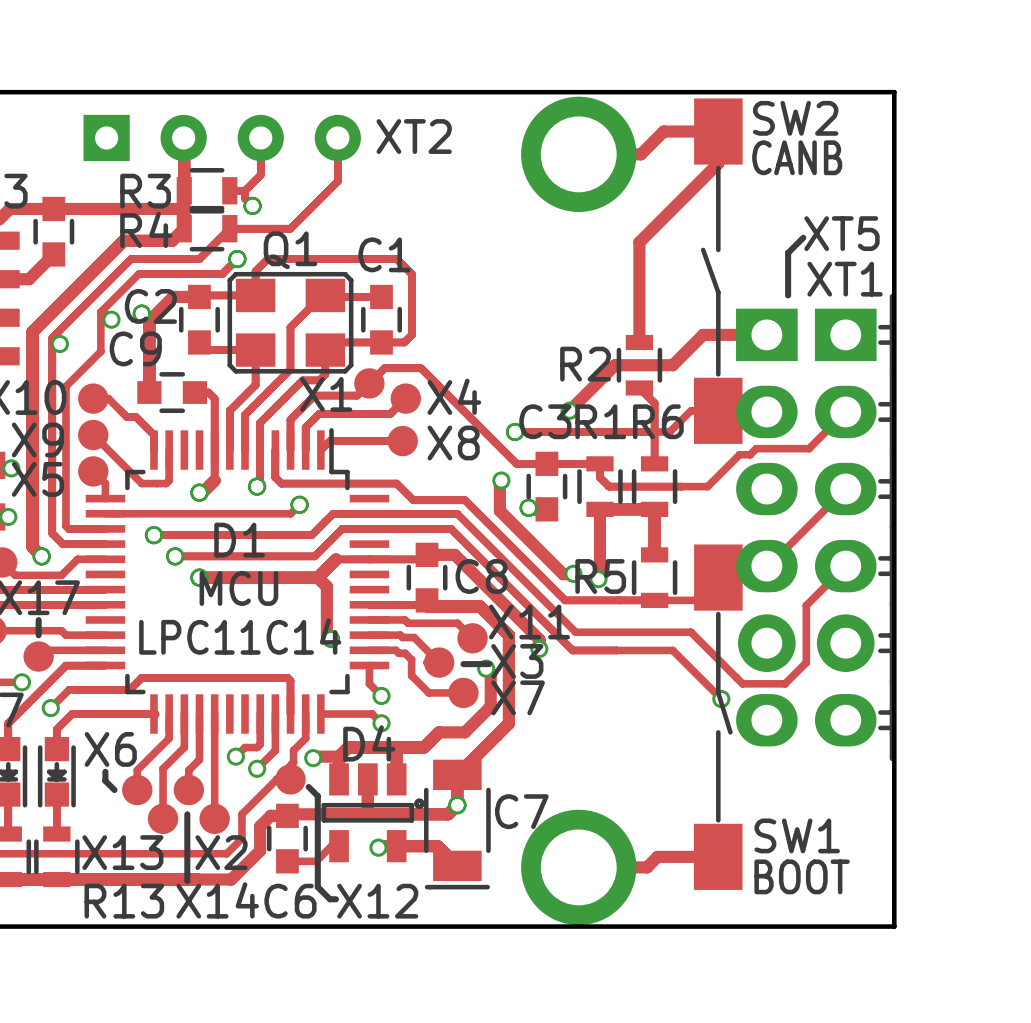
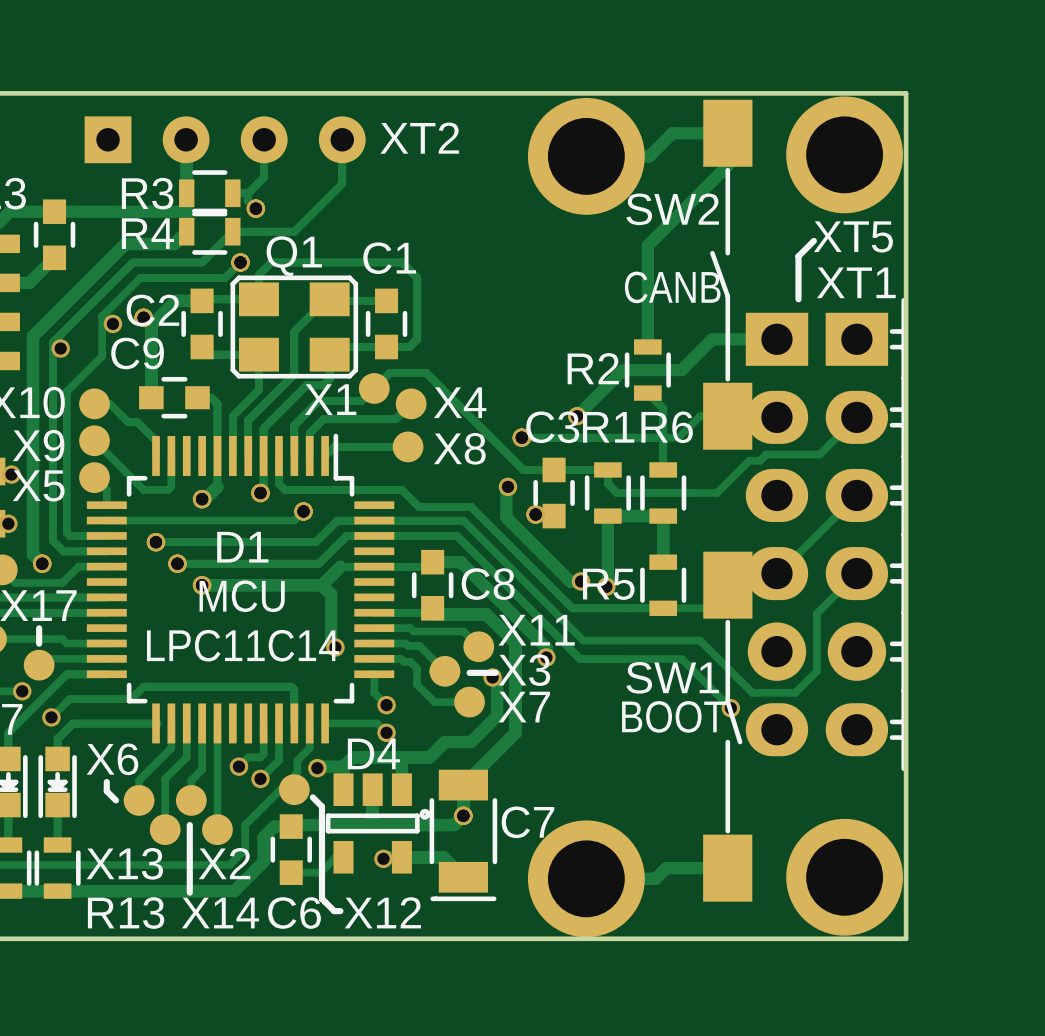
SW2 name position: SW2 (795, 118) -> SW2 (672, 209)
part: none -> (844, 154)
text position: CANB (797, 157) -> CANB (672, 287)
SW1 name position: SW1 (797, 835) -> SW1 (672, 677)
part: none -> (844, 877)
text position: BOOT (802, 876) -> BOOT (673, 716)

